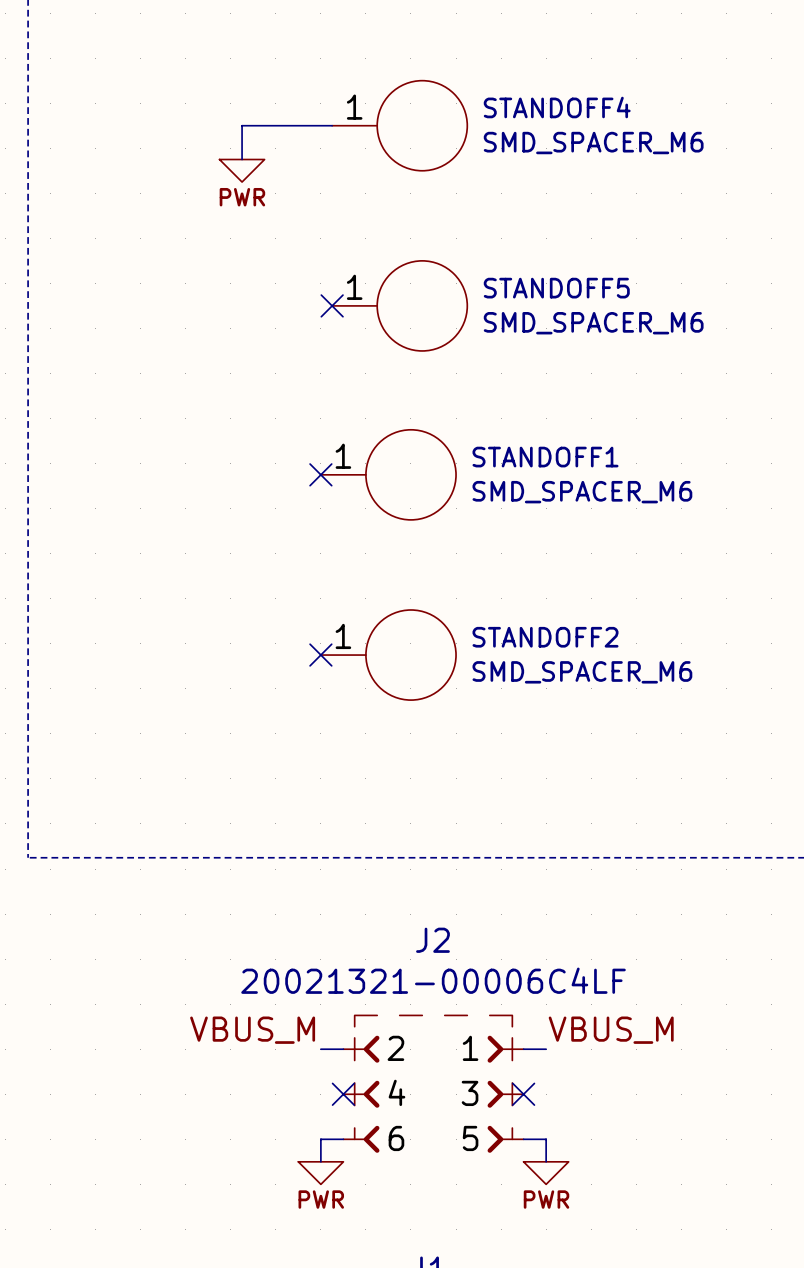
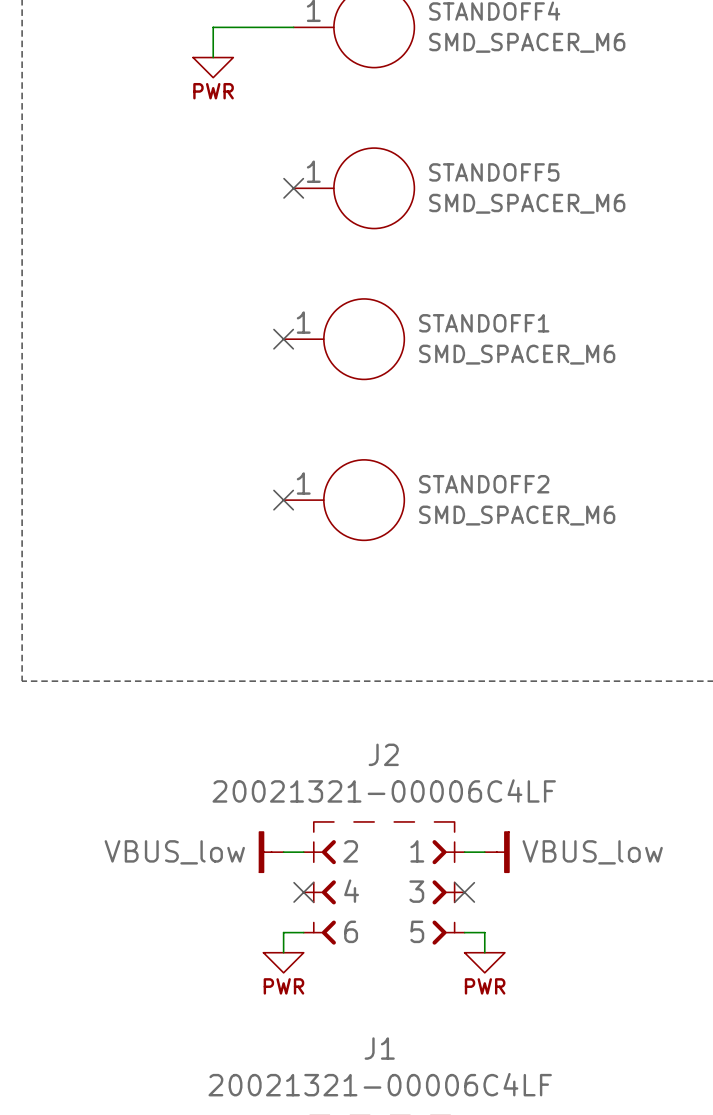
label: VBUS_M (252, 1030) -> none
label: VBUS_M (611, 1030) -> none
power symbol: none -> VBUS_low (271, 852)
power symbol: none -> VBUS_low (496, 852)

